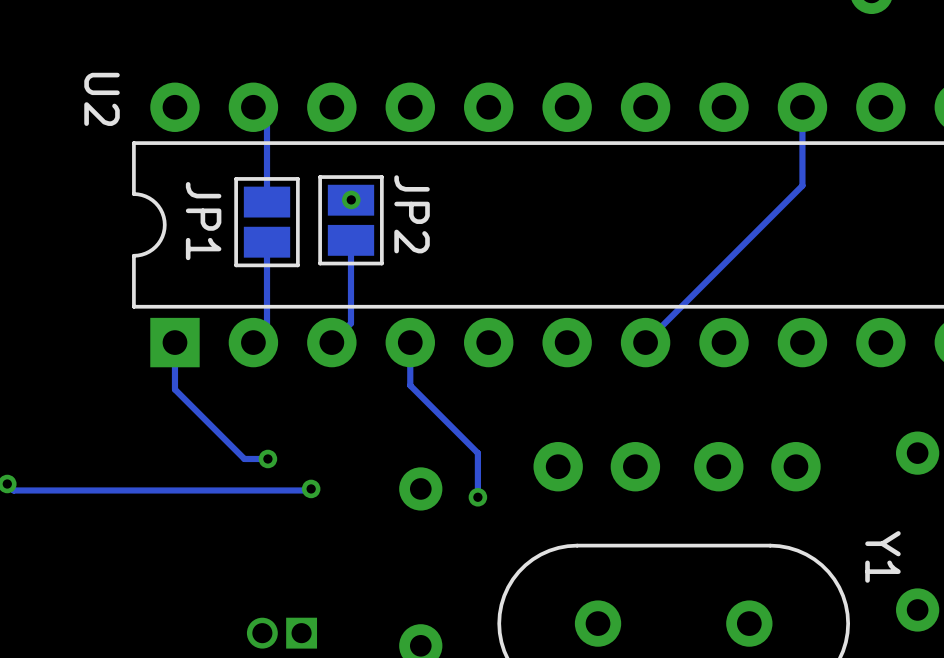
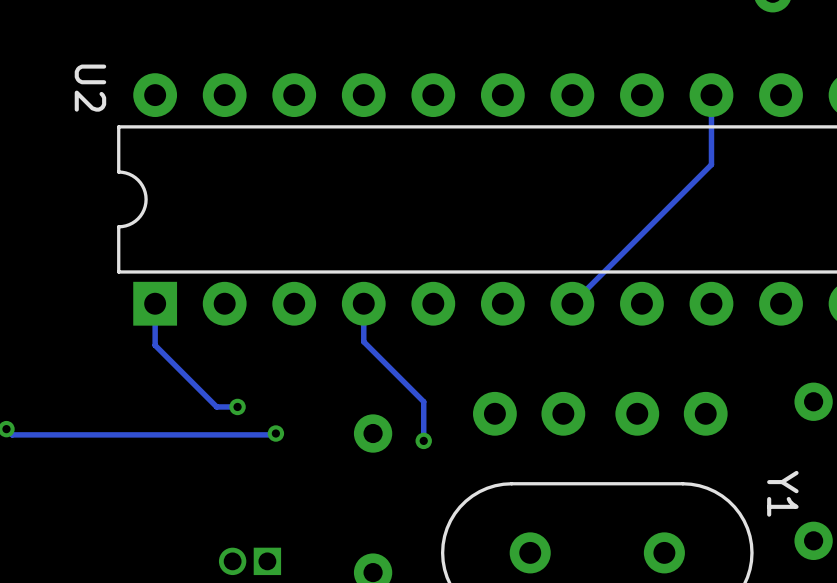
track: (253, 107) (267, 120) (267, 202) -> none
via: (351, 199) -> none
JP2: (350, 220) -> none
JP1: (267, 222) -> none
track: (350, 240) (350, 323) (331, 342) -> none
track: (267, 242) (267, 328) (253, 342) -> none

